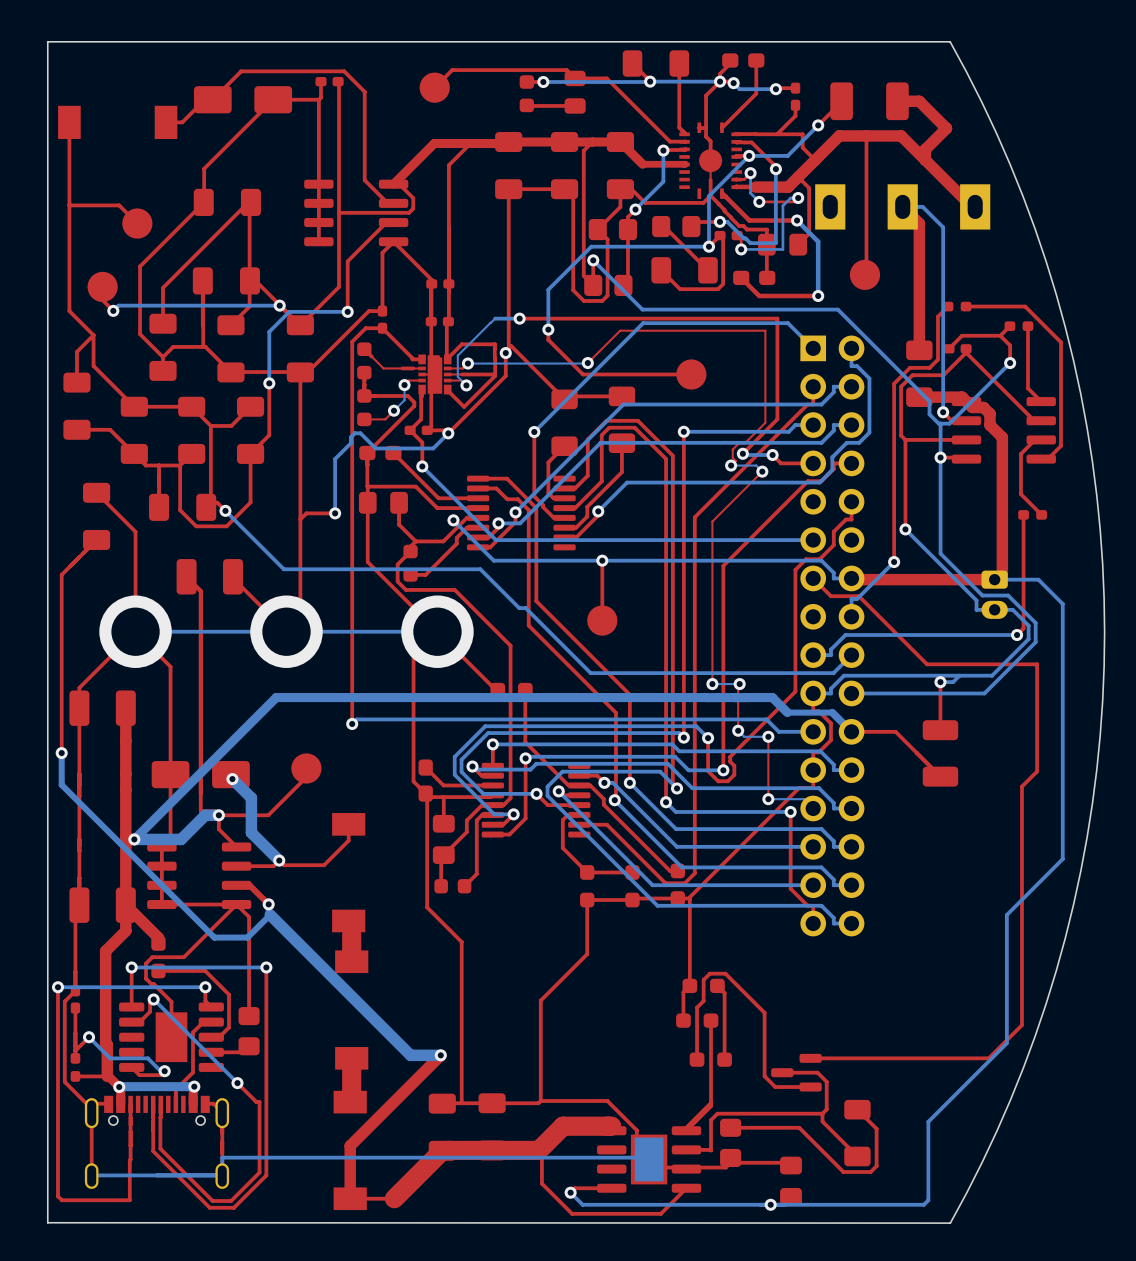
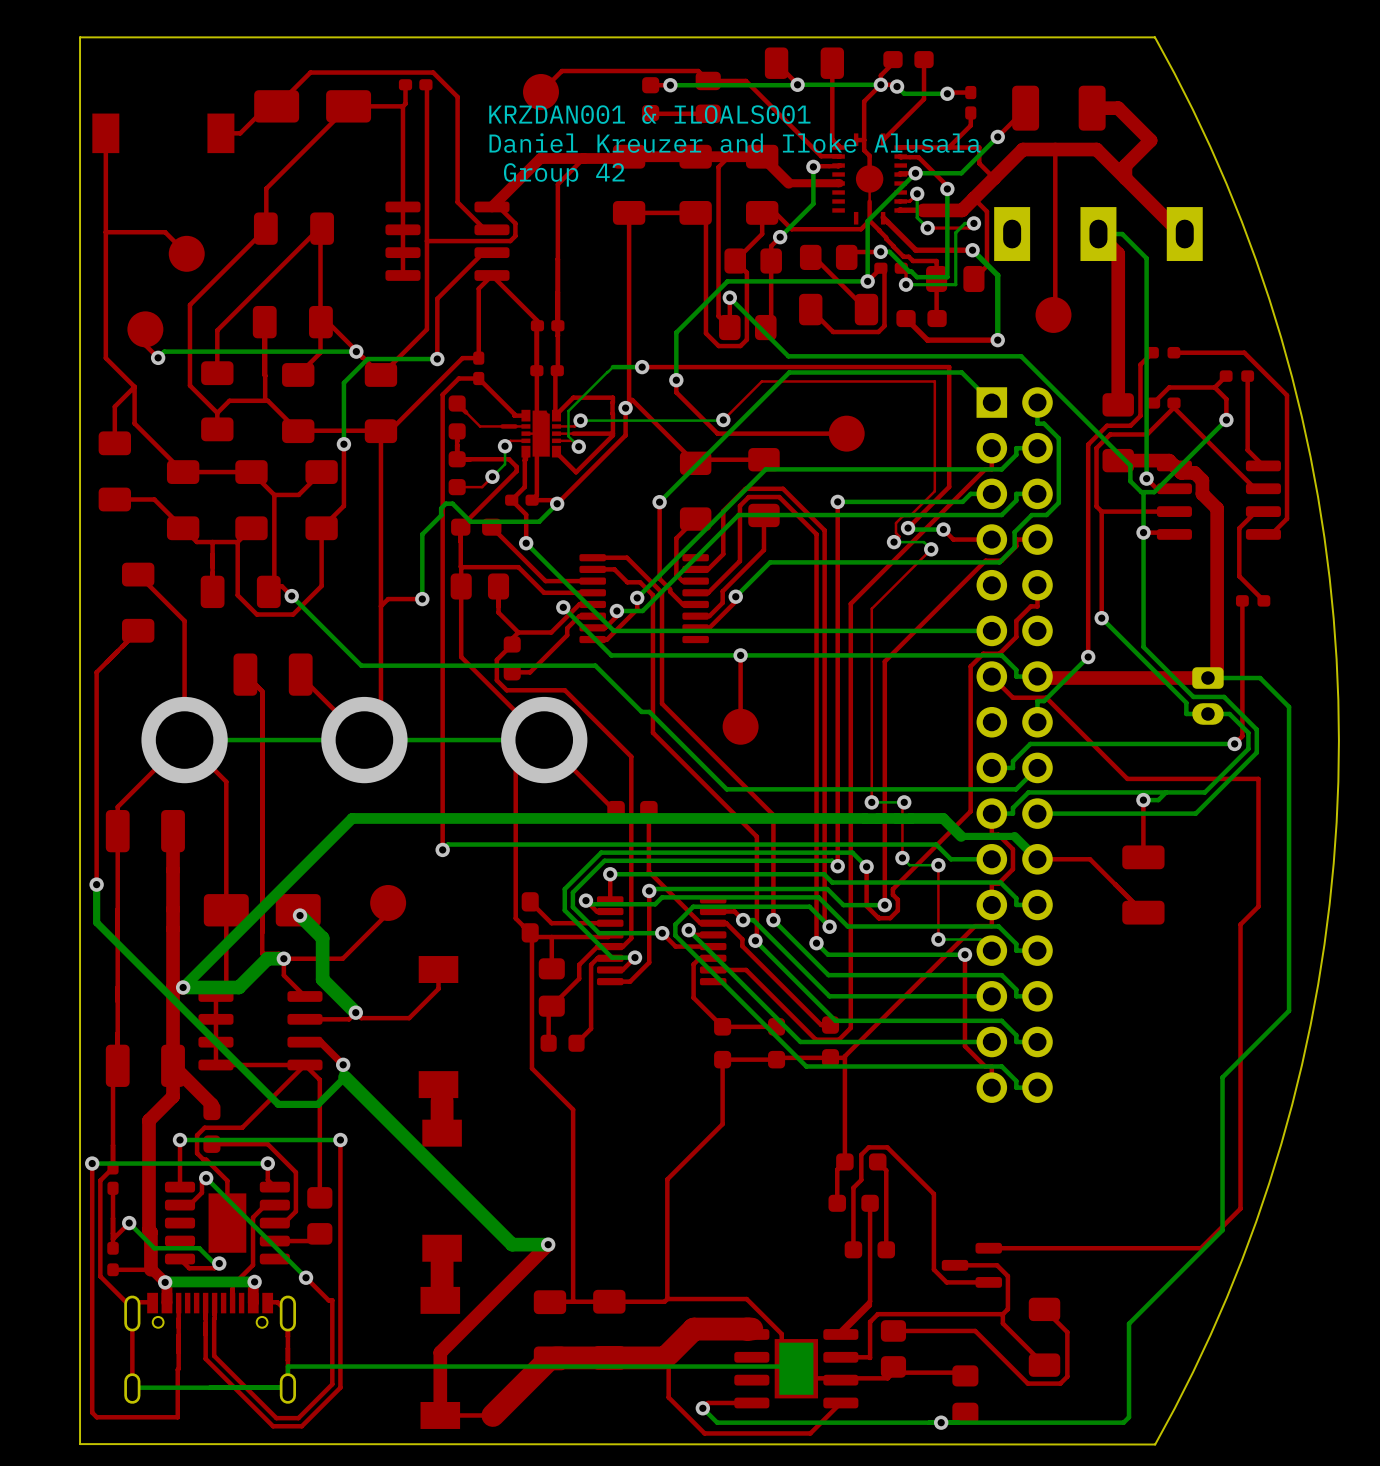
text: none -> KRZDAN001 & ILOALS001 (649, 114)
text: none -> Daniel Kreuzer and Iloke Alusala (734, 143)
text: none -> Group 42 (564, 174)

